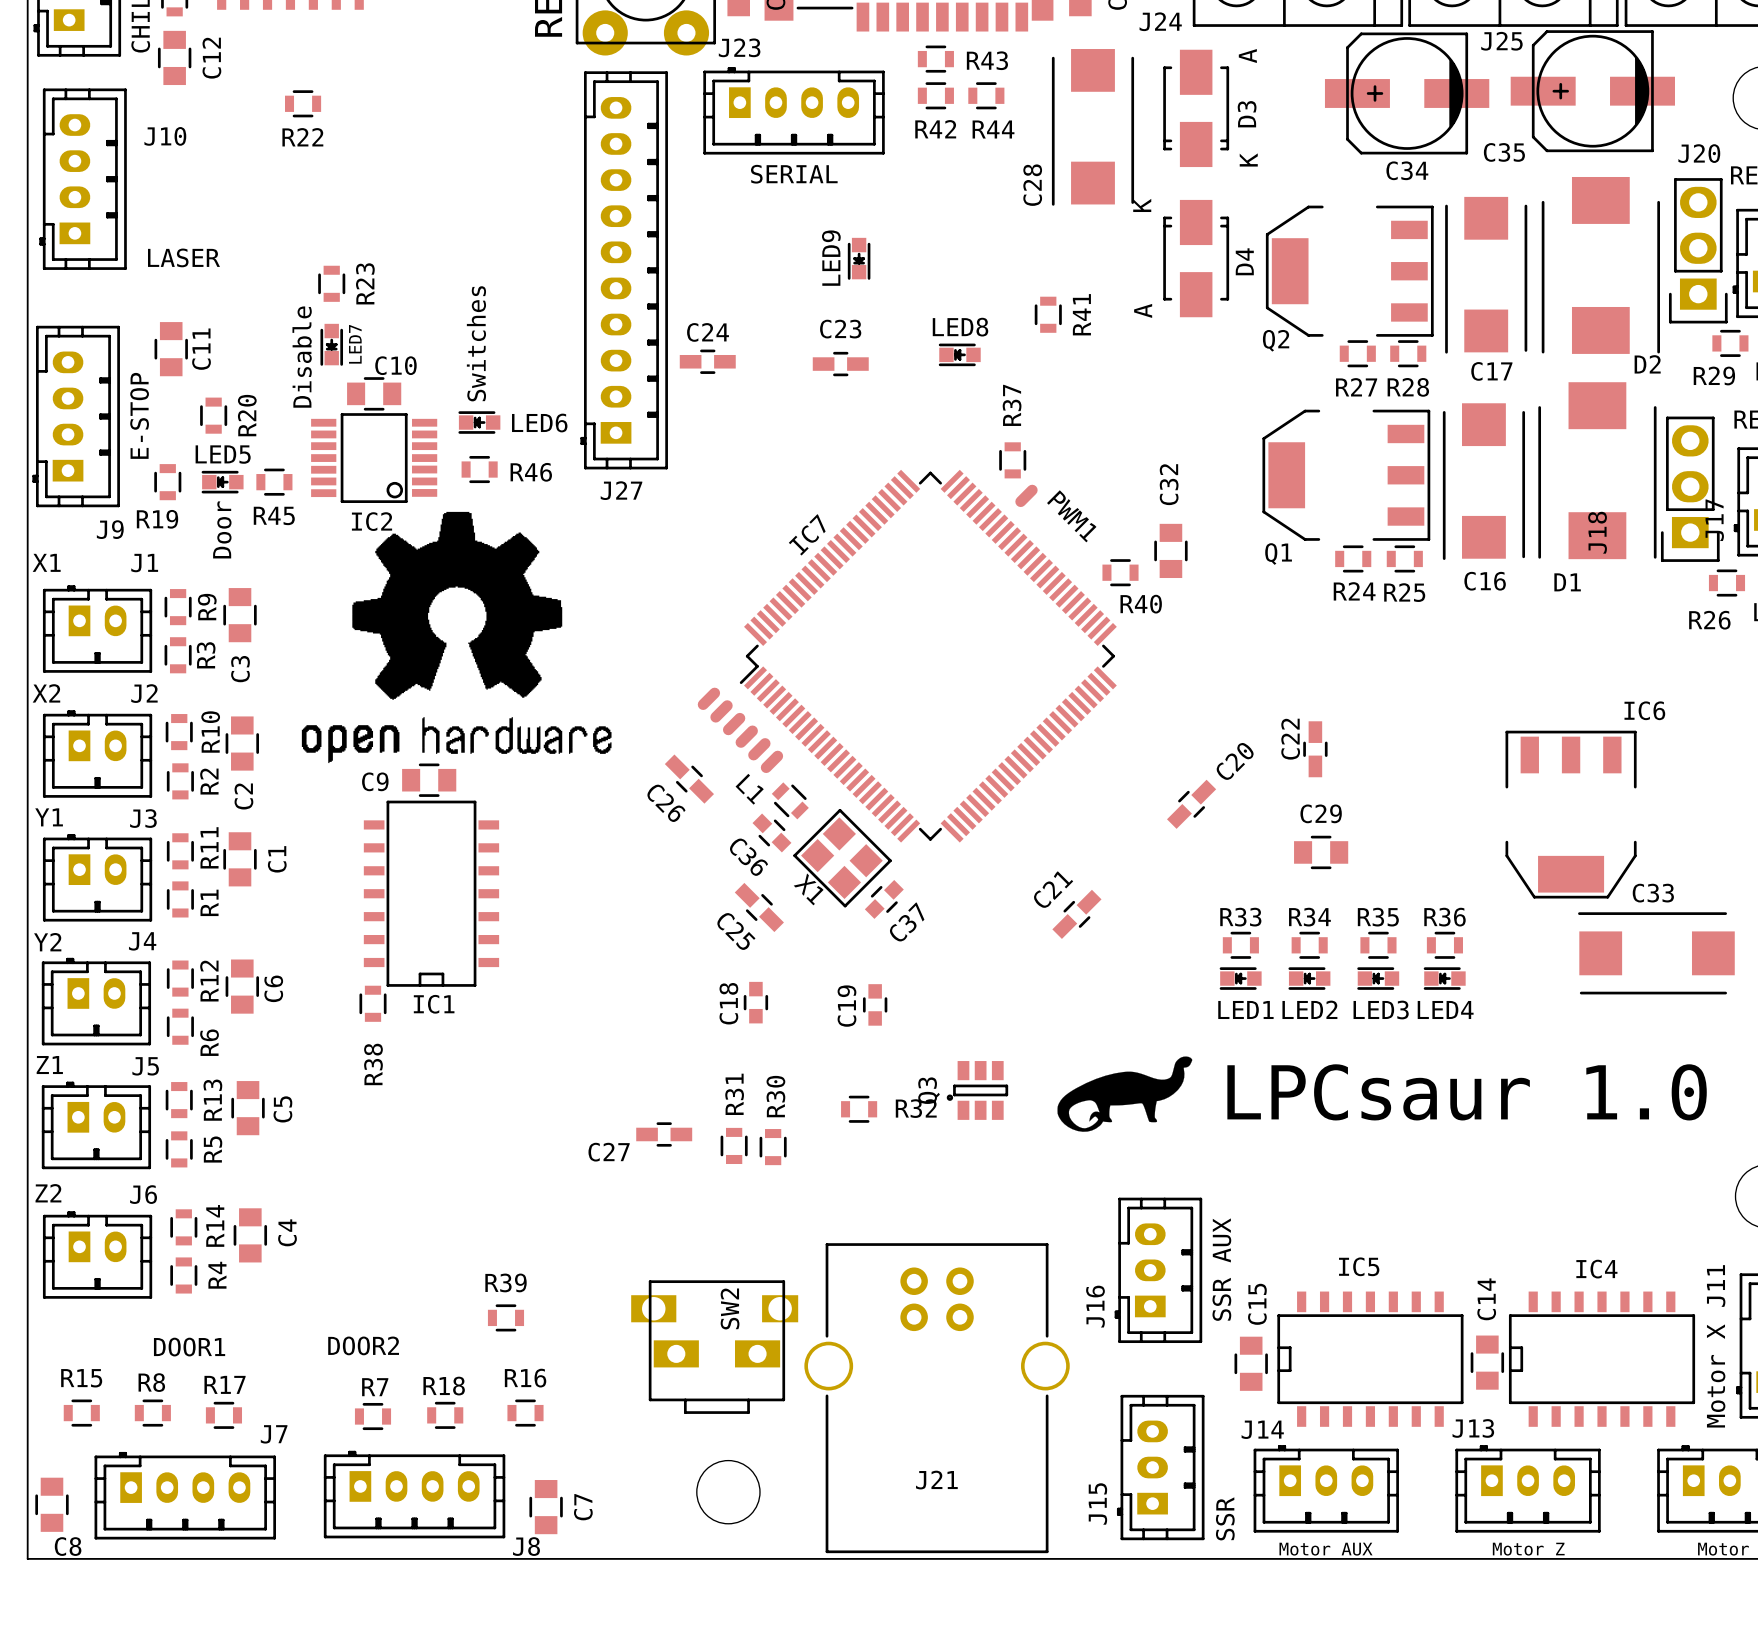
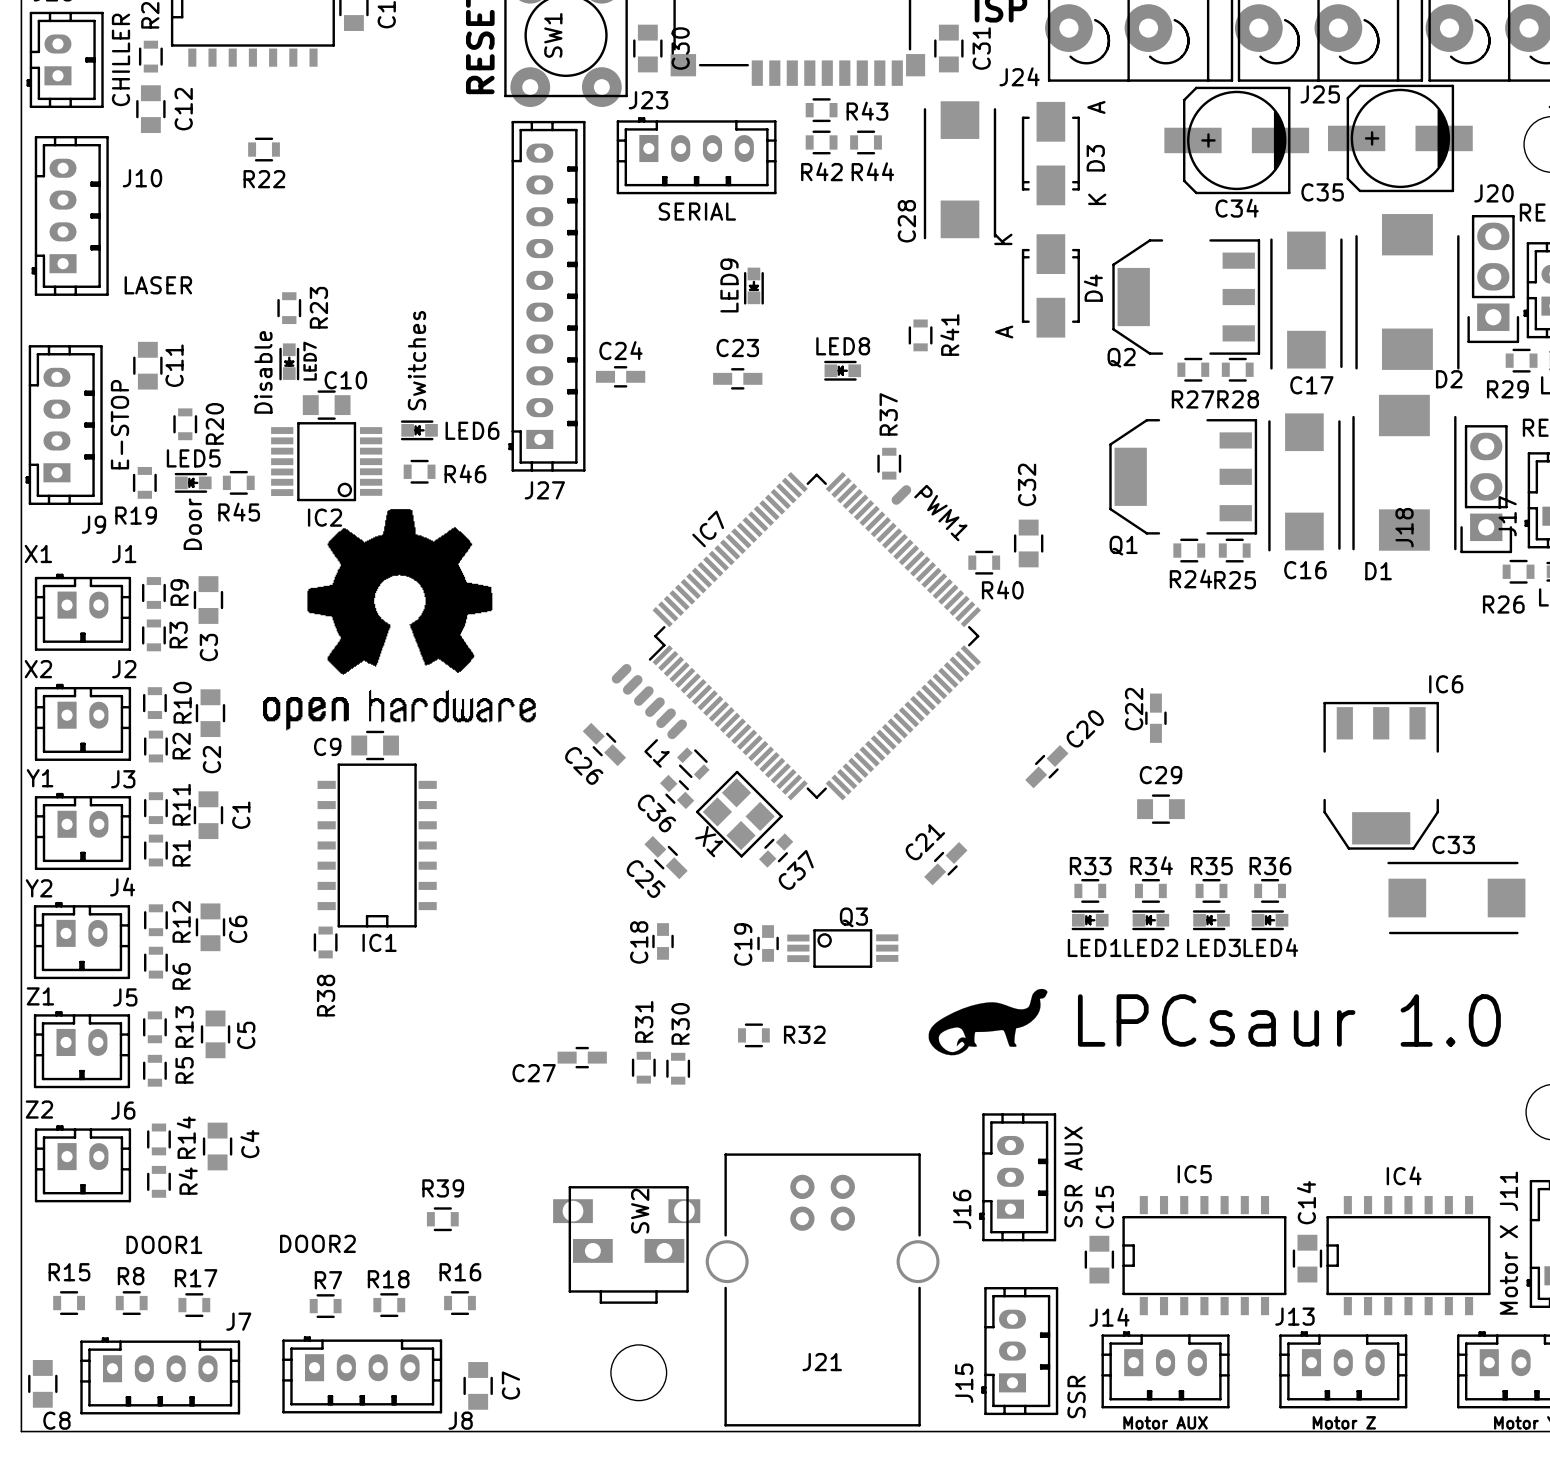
Q3 footprint: [946, 1061, 1009, 1120] -> [787, 929, 899, 968]
Q3 name position: Q3 (929, 1090) -> Q3 (853, 917)

